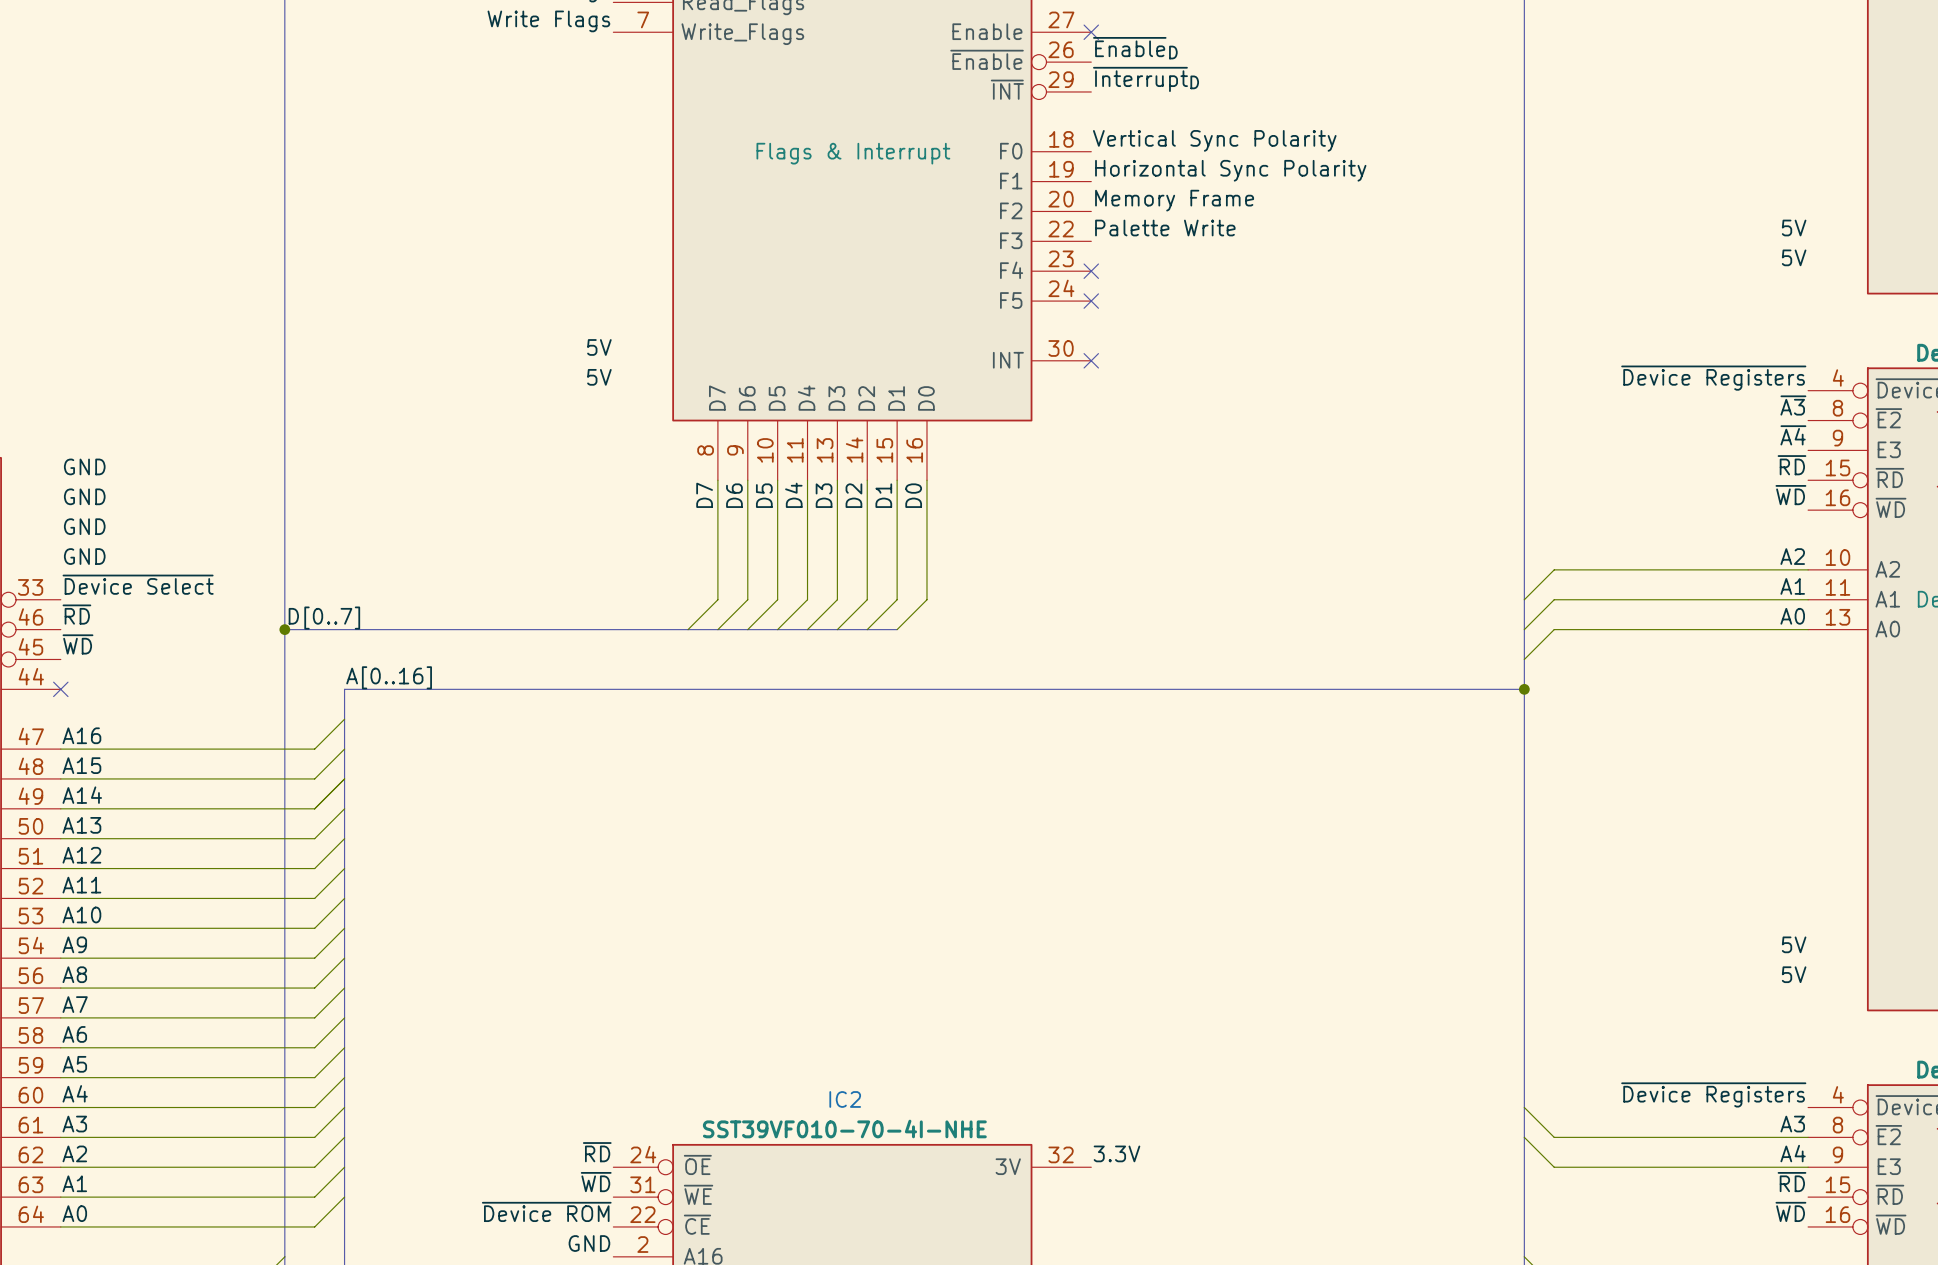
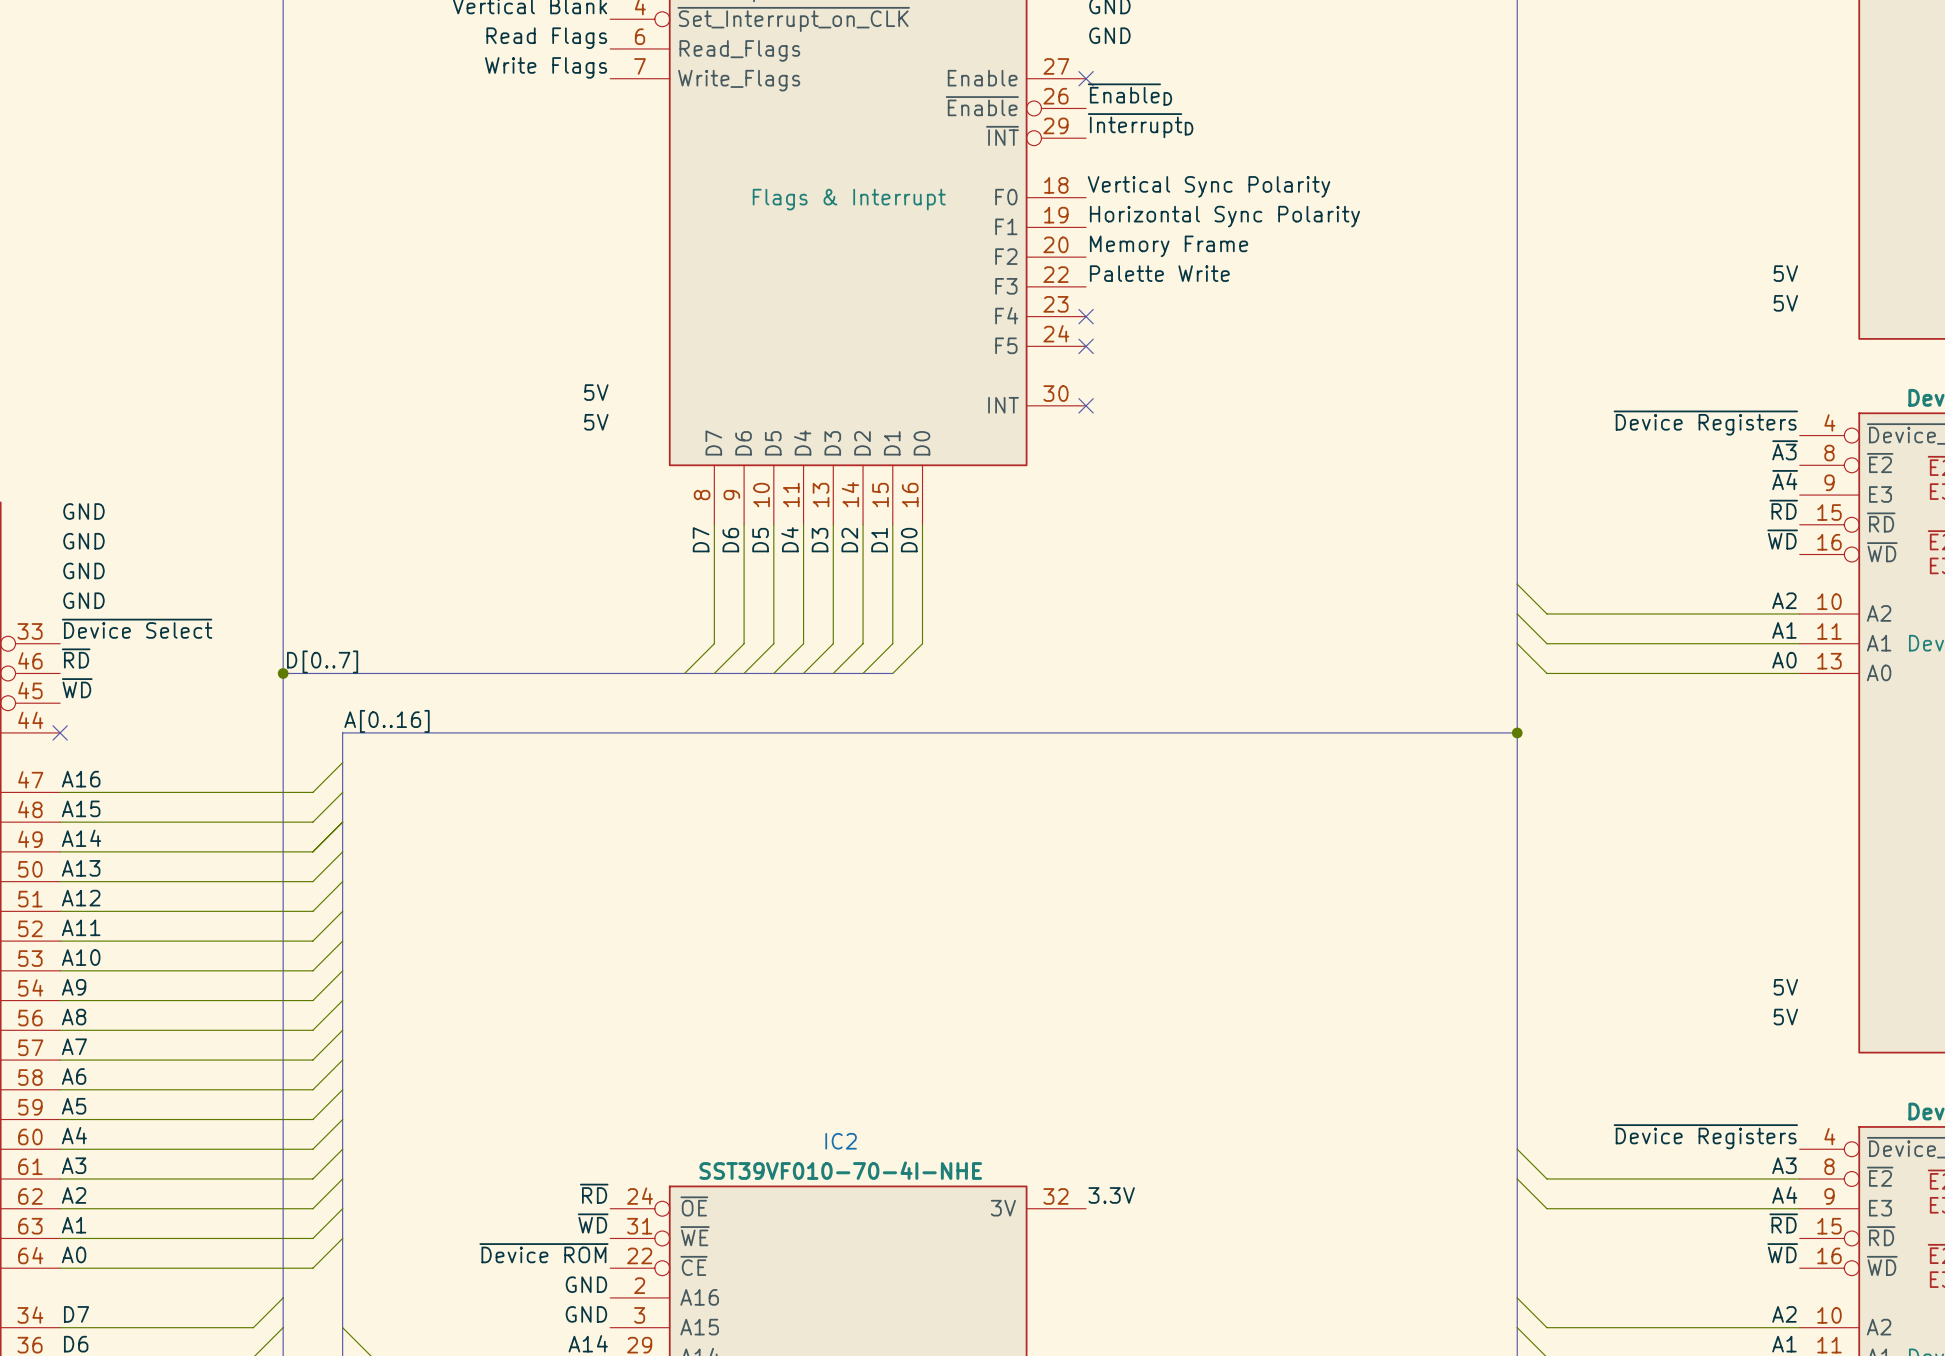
wire: (1554, 569) (1524, 599) -> (1546, 613) (1517, 584)
wire: (1554, 599) (1524, 629) -> (1546, 643) (1517, 613)
wire: (1554, 629) (1524, 659) -> (1546, 673) (1517, 643)

